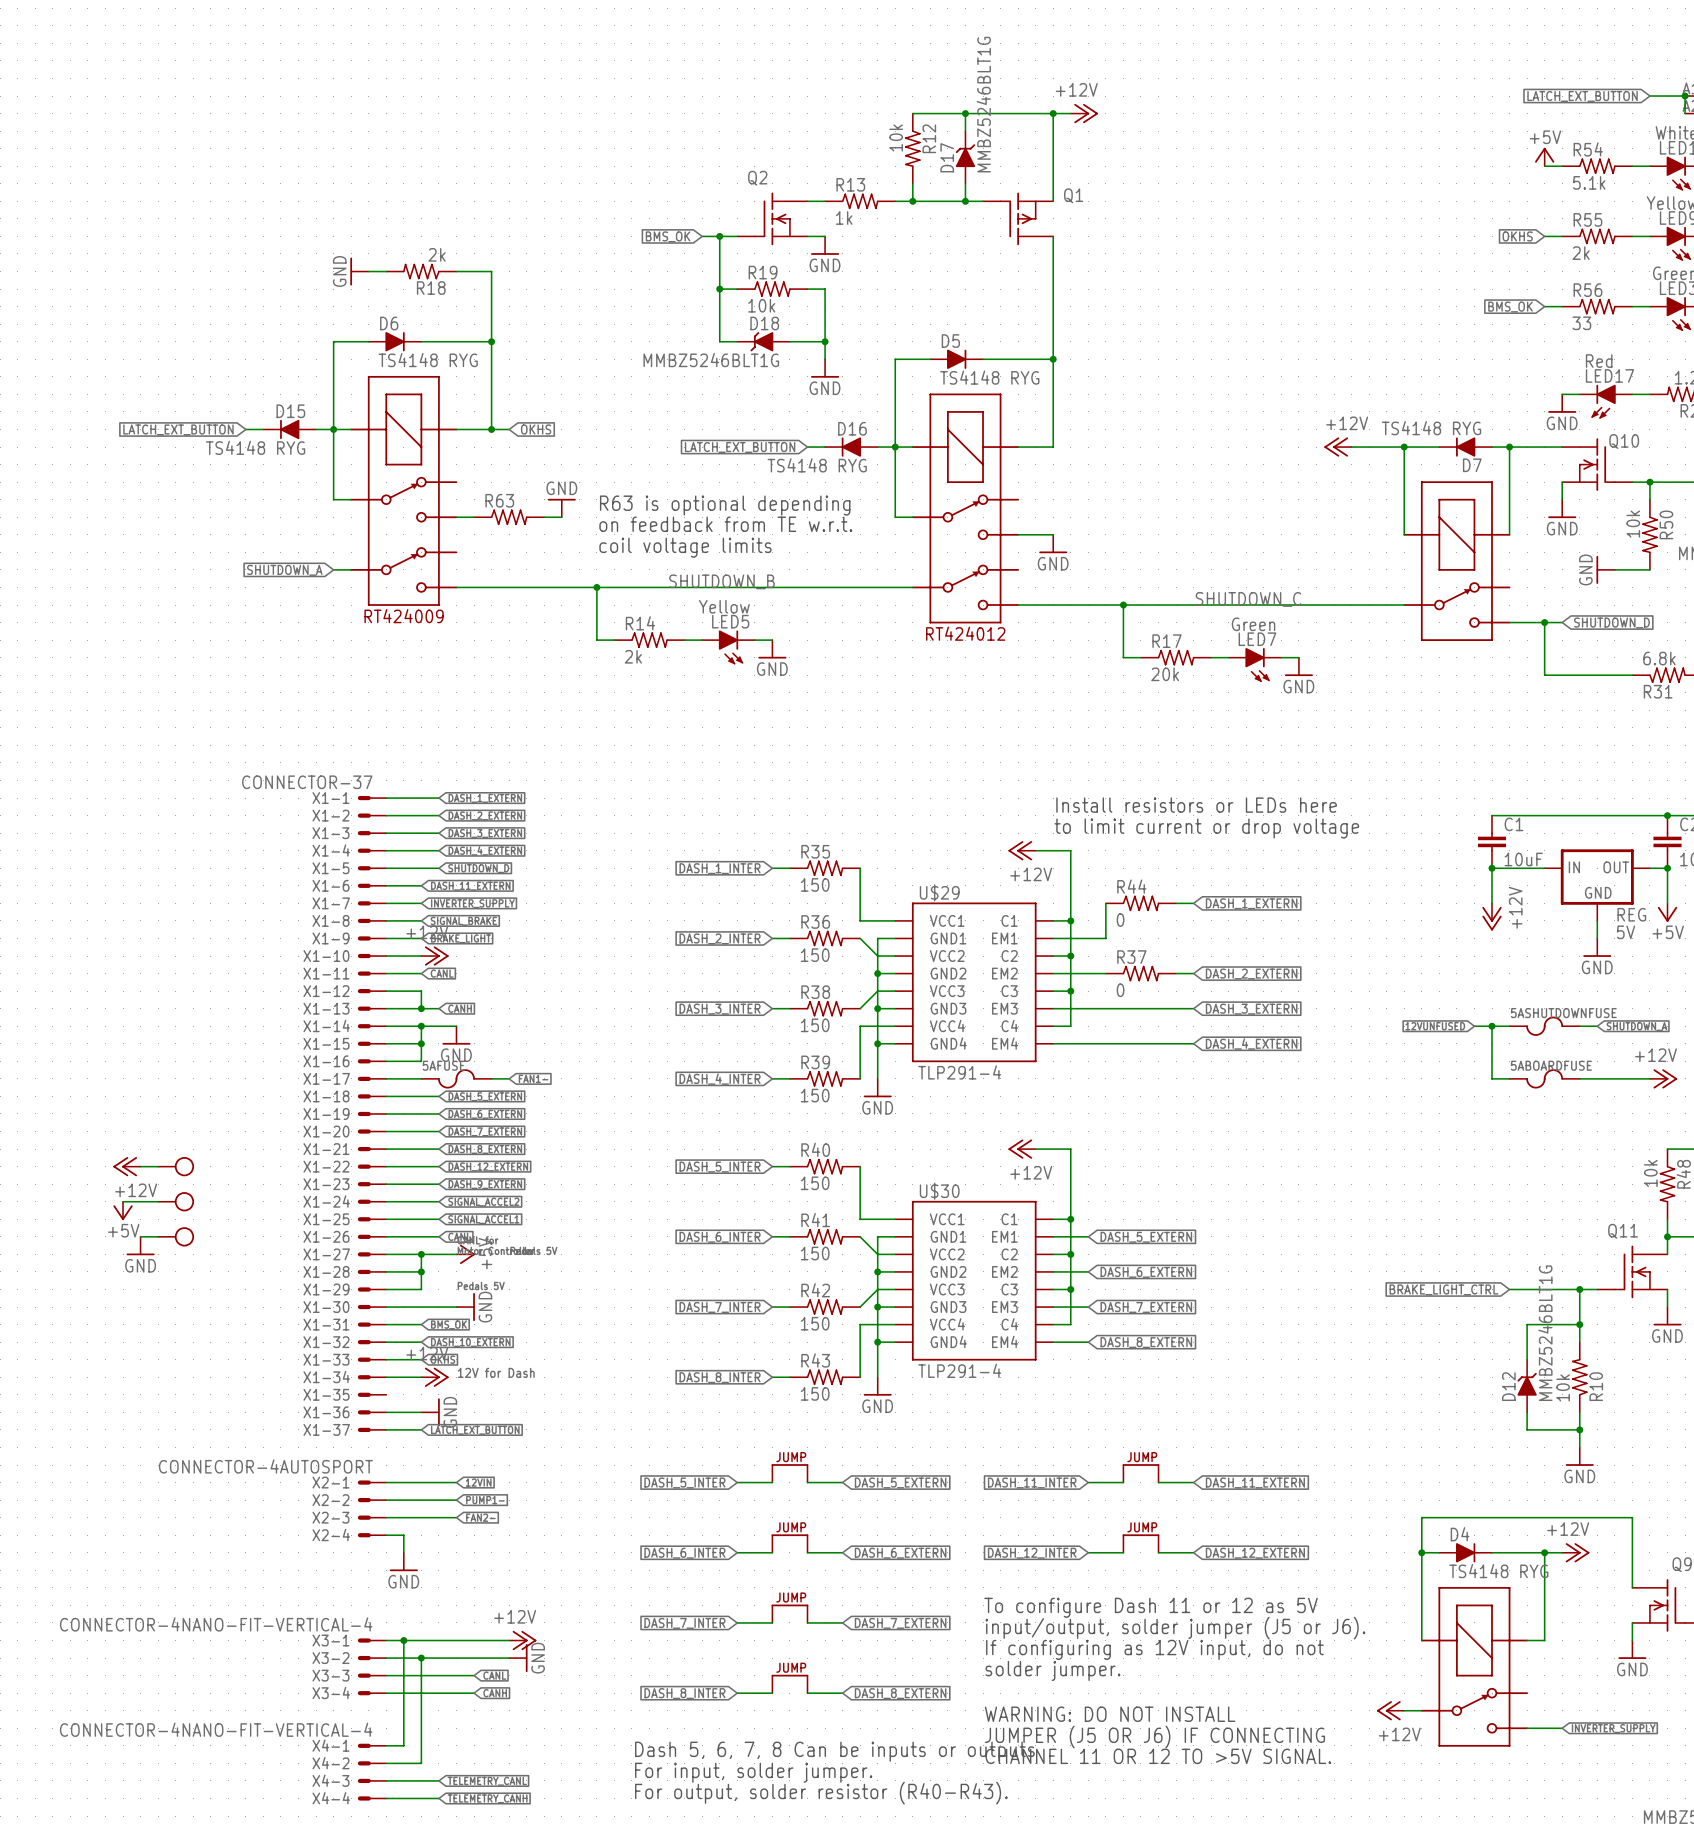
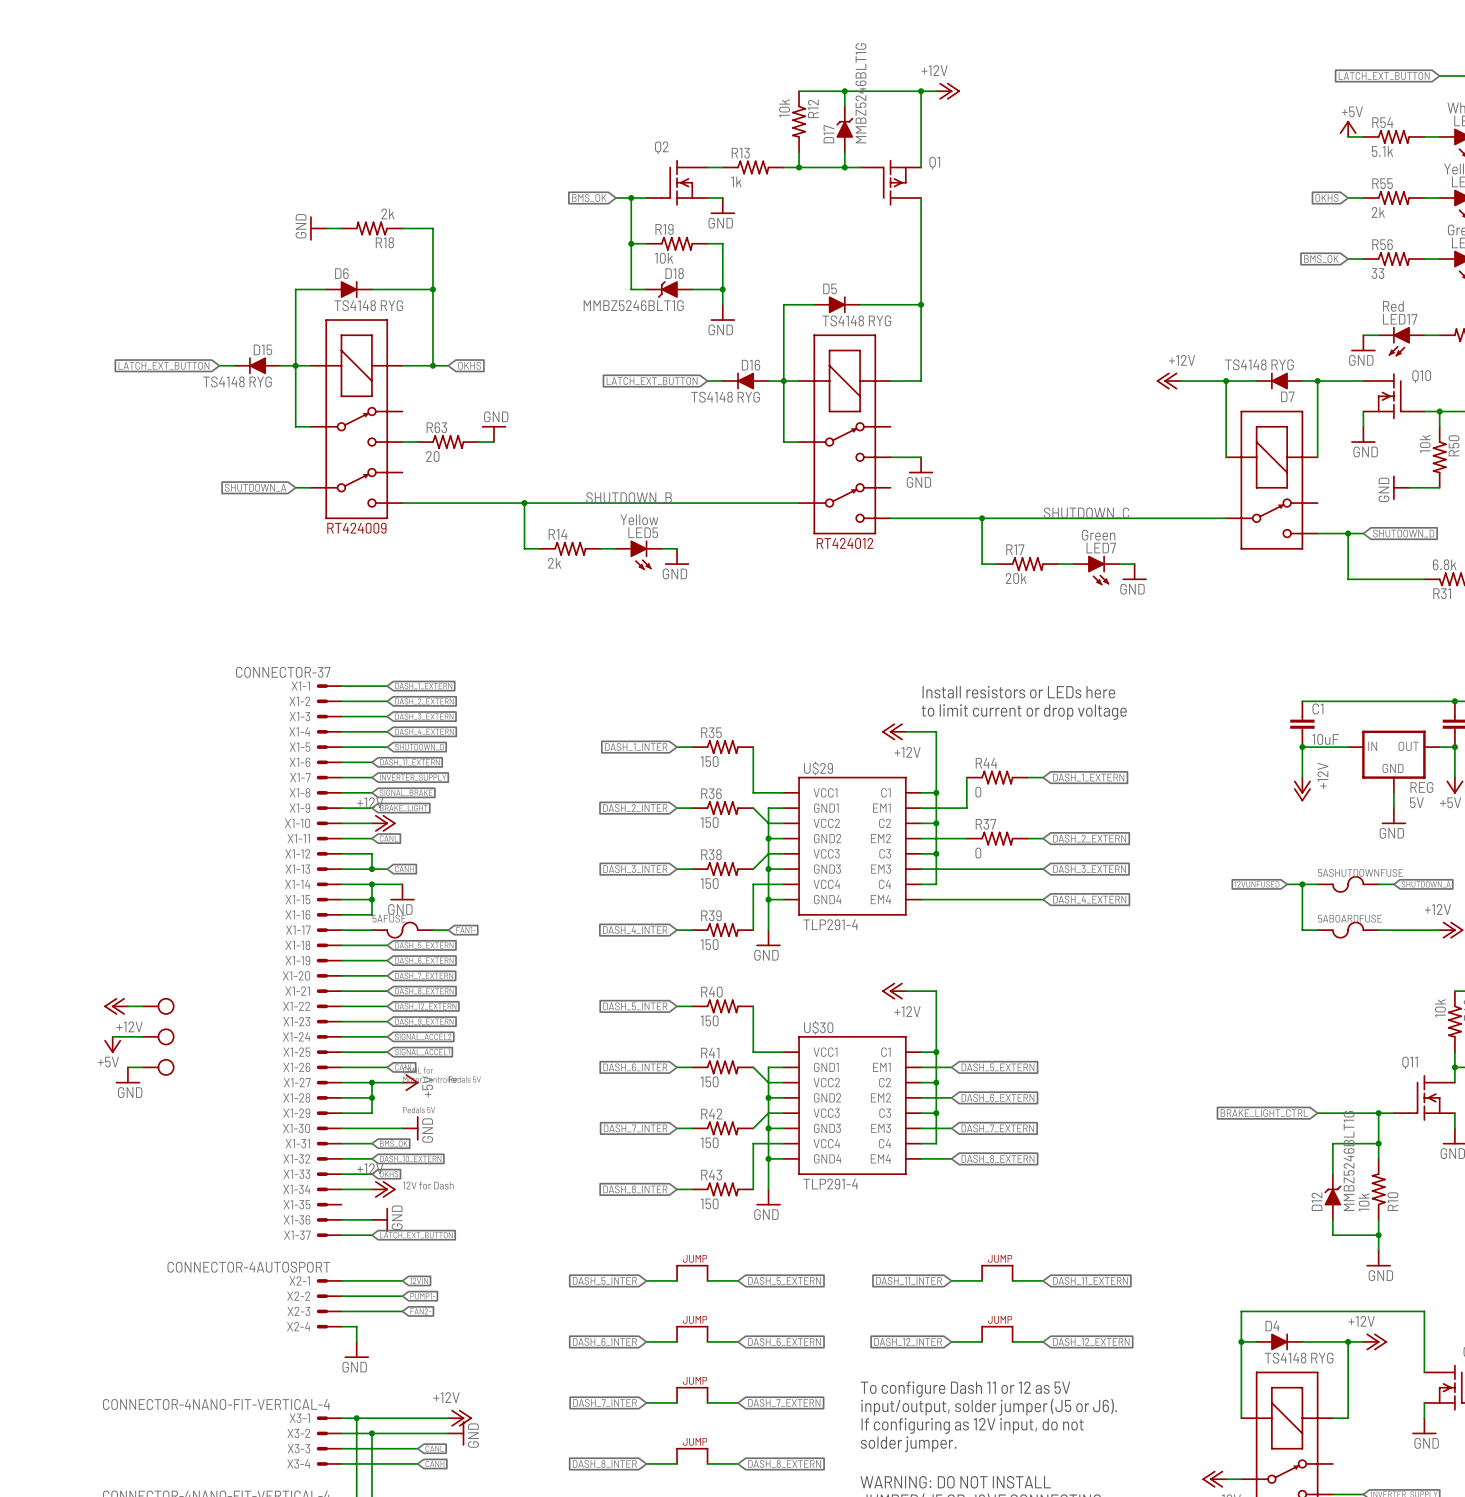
text: R63 is optional depending (725, 505) -> none
text: on feedback from TE w.r.t. (725, 524) -> none
R63 value: none -> 20 (432, 456)
text: coil voltage limits (685, 547) -> none

